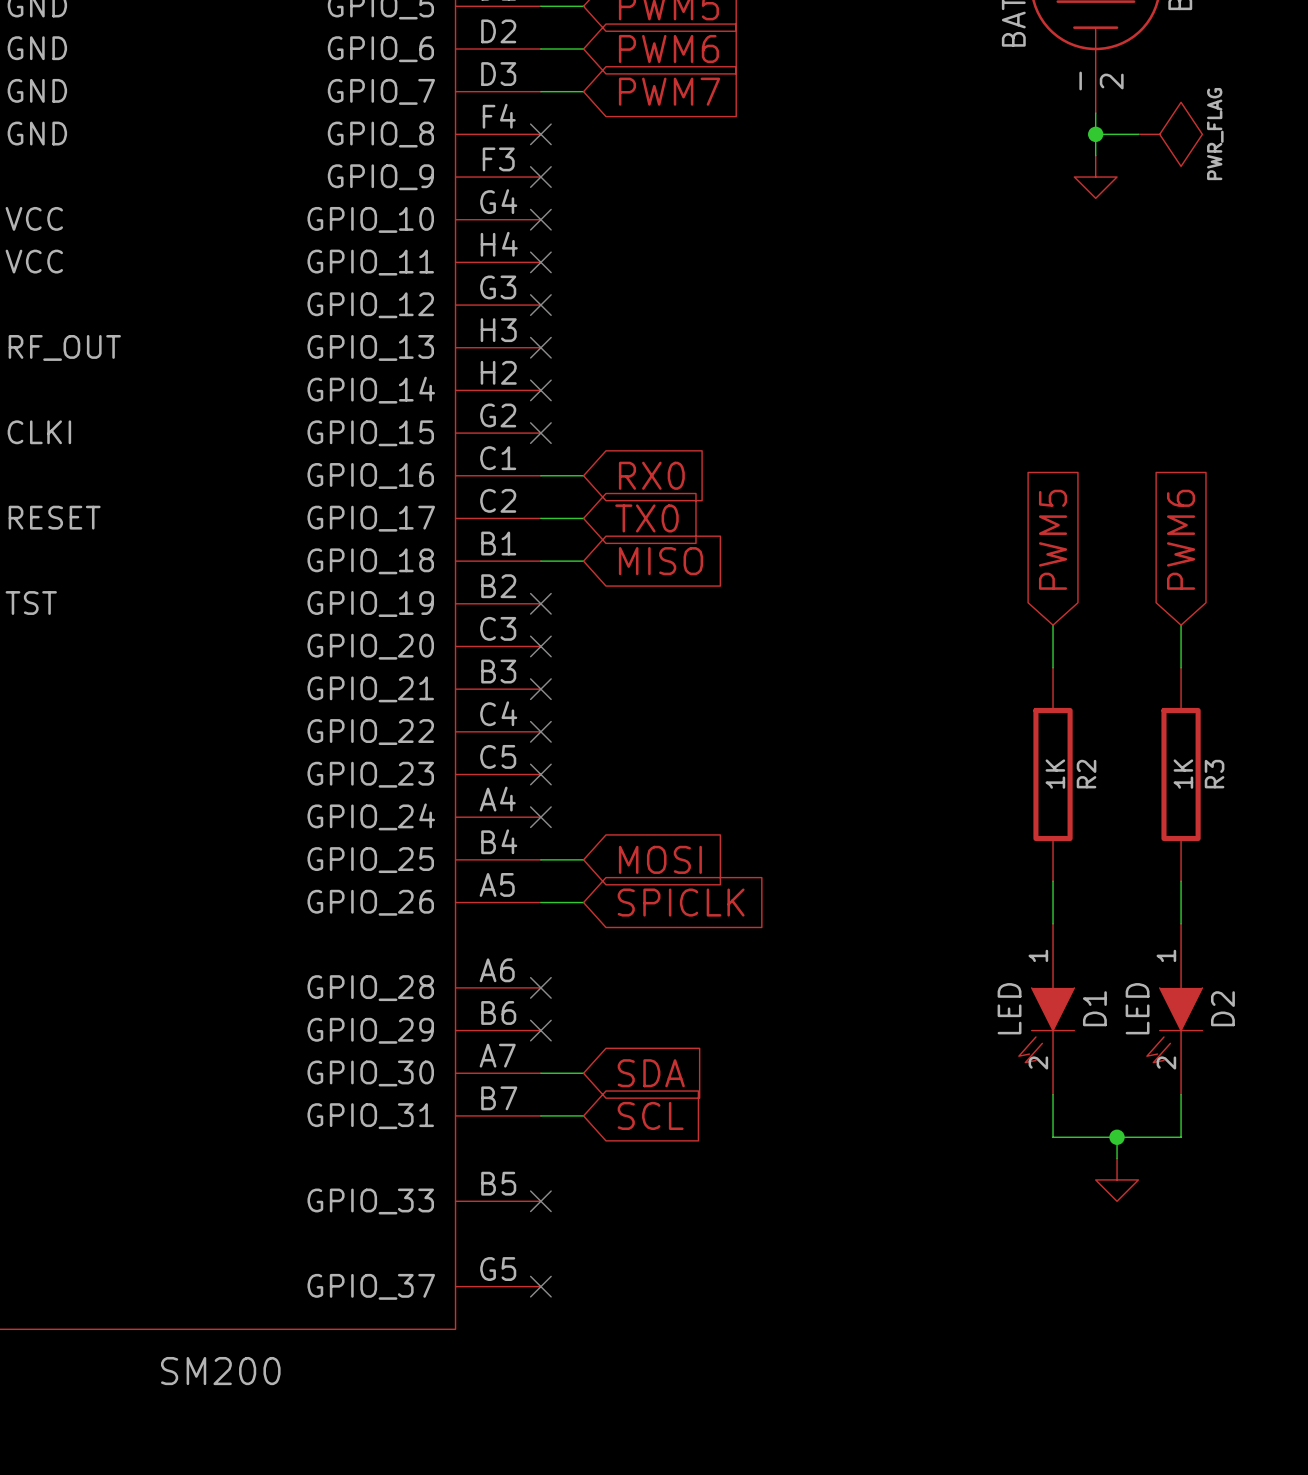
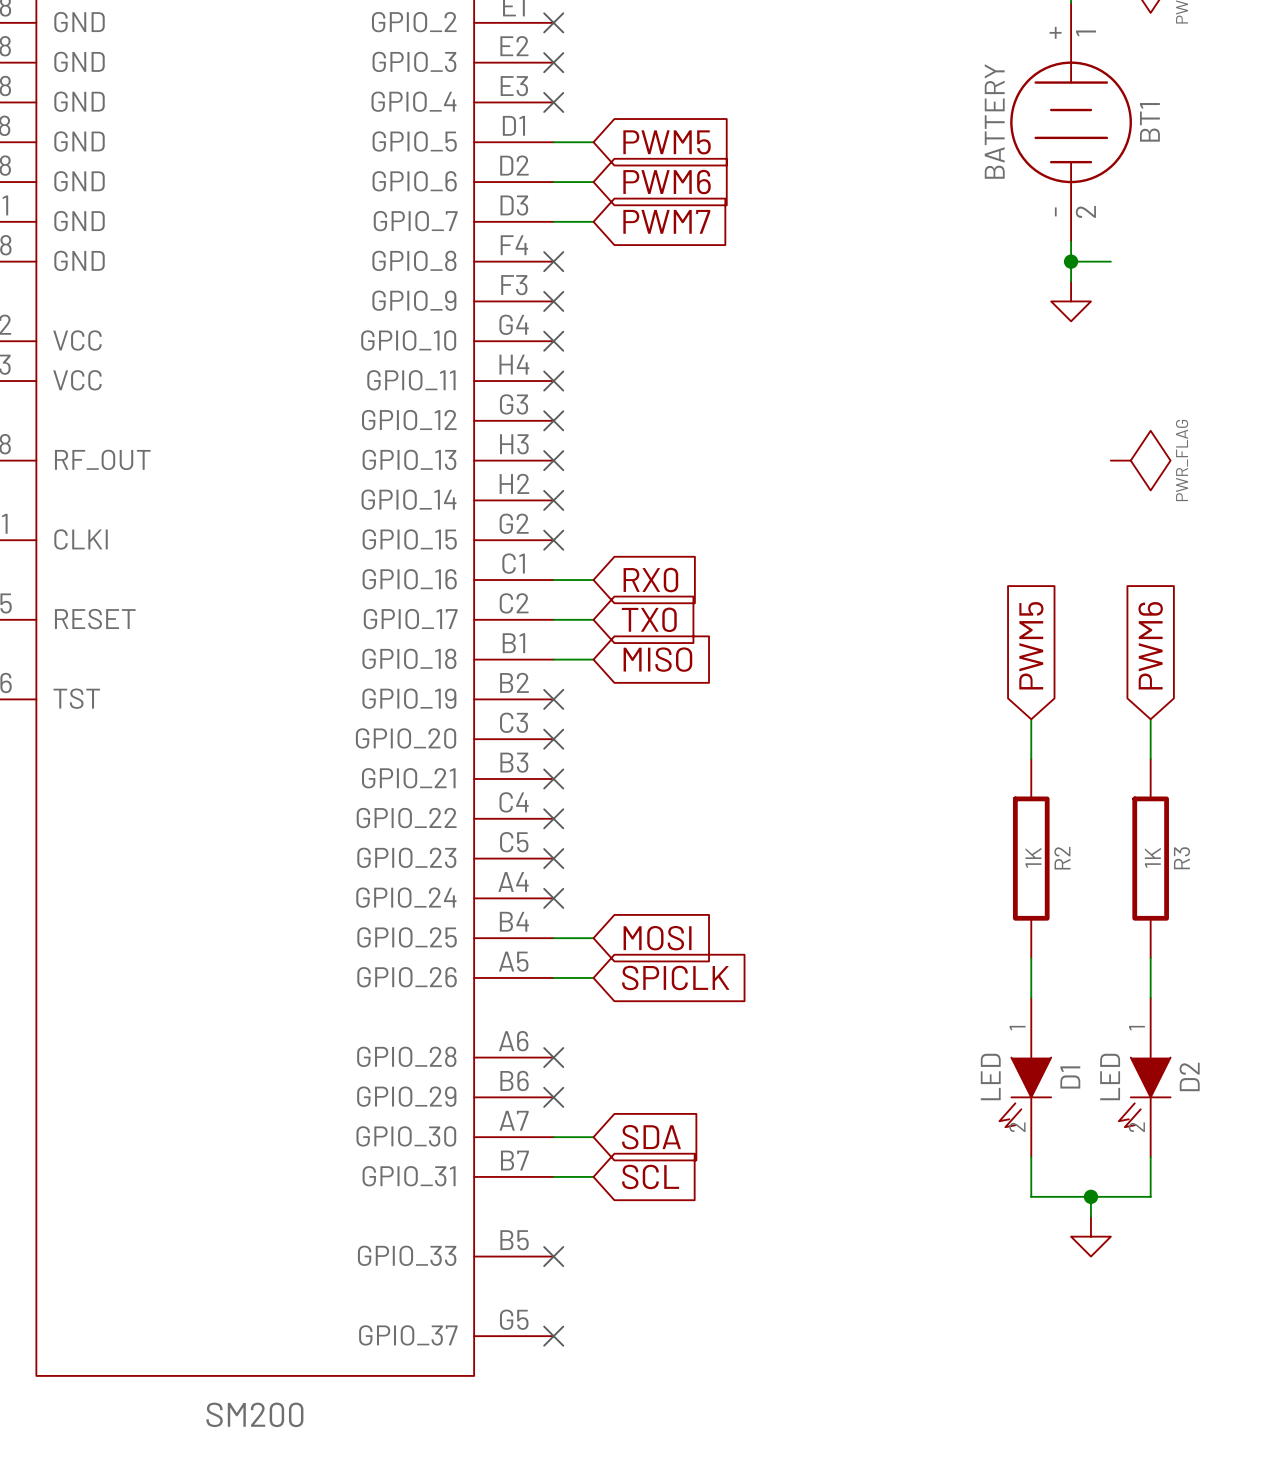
power symbol position: PWR_FLAG (1170, 134) -> PWR_FLAG (1140, 460)

